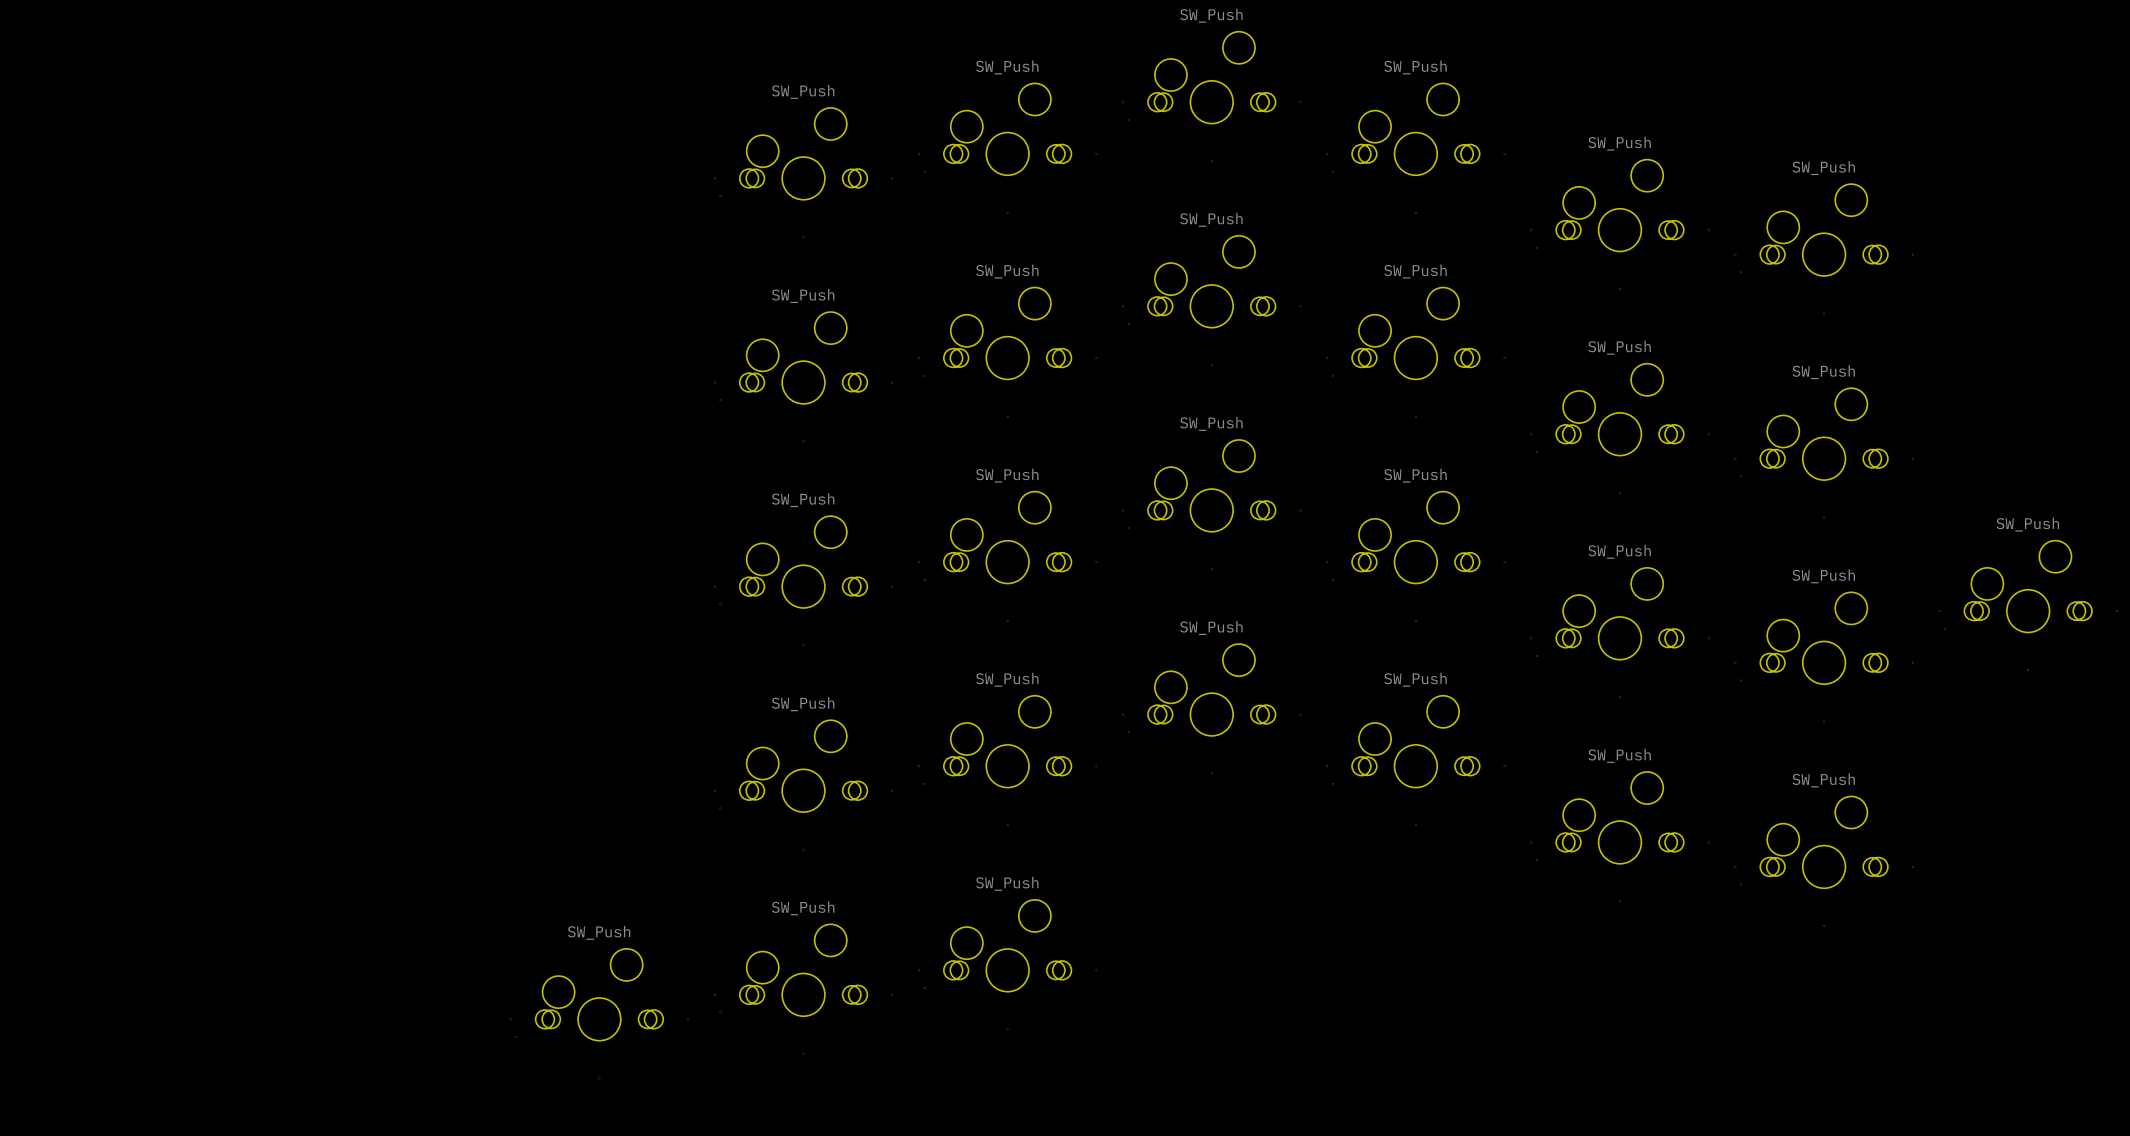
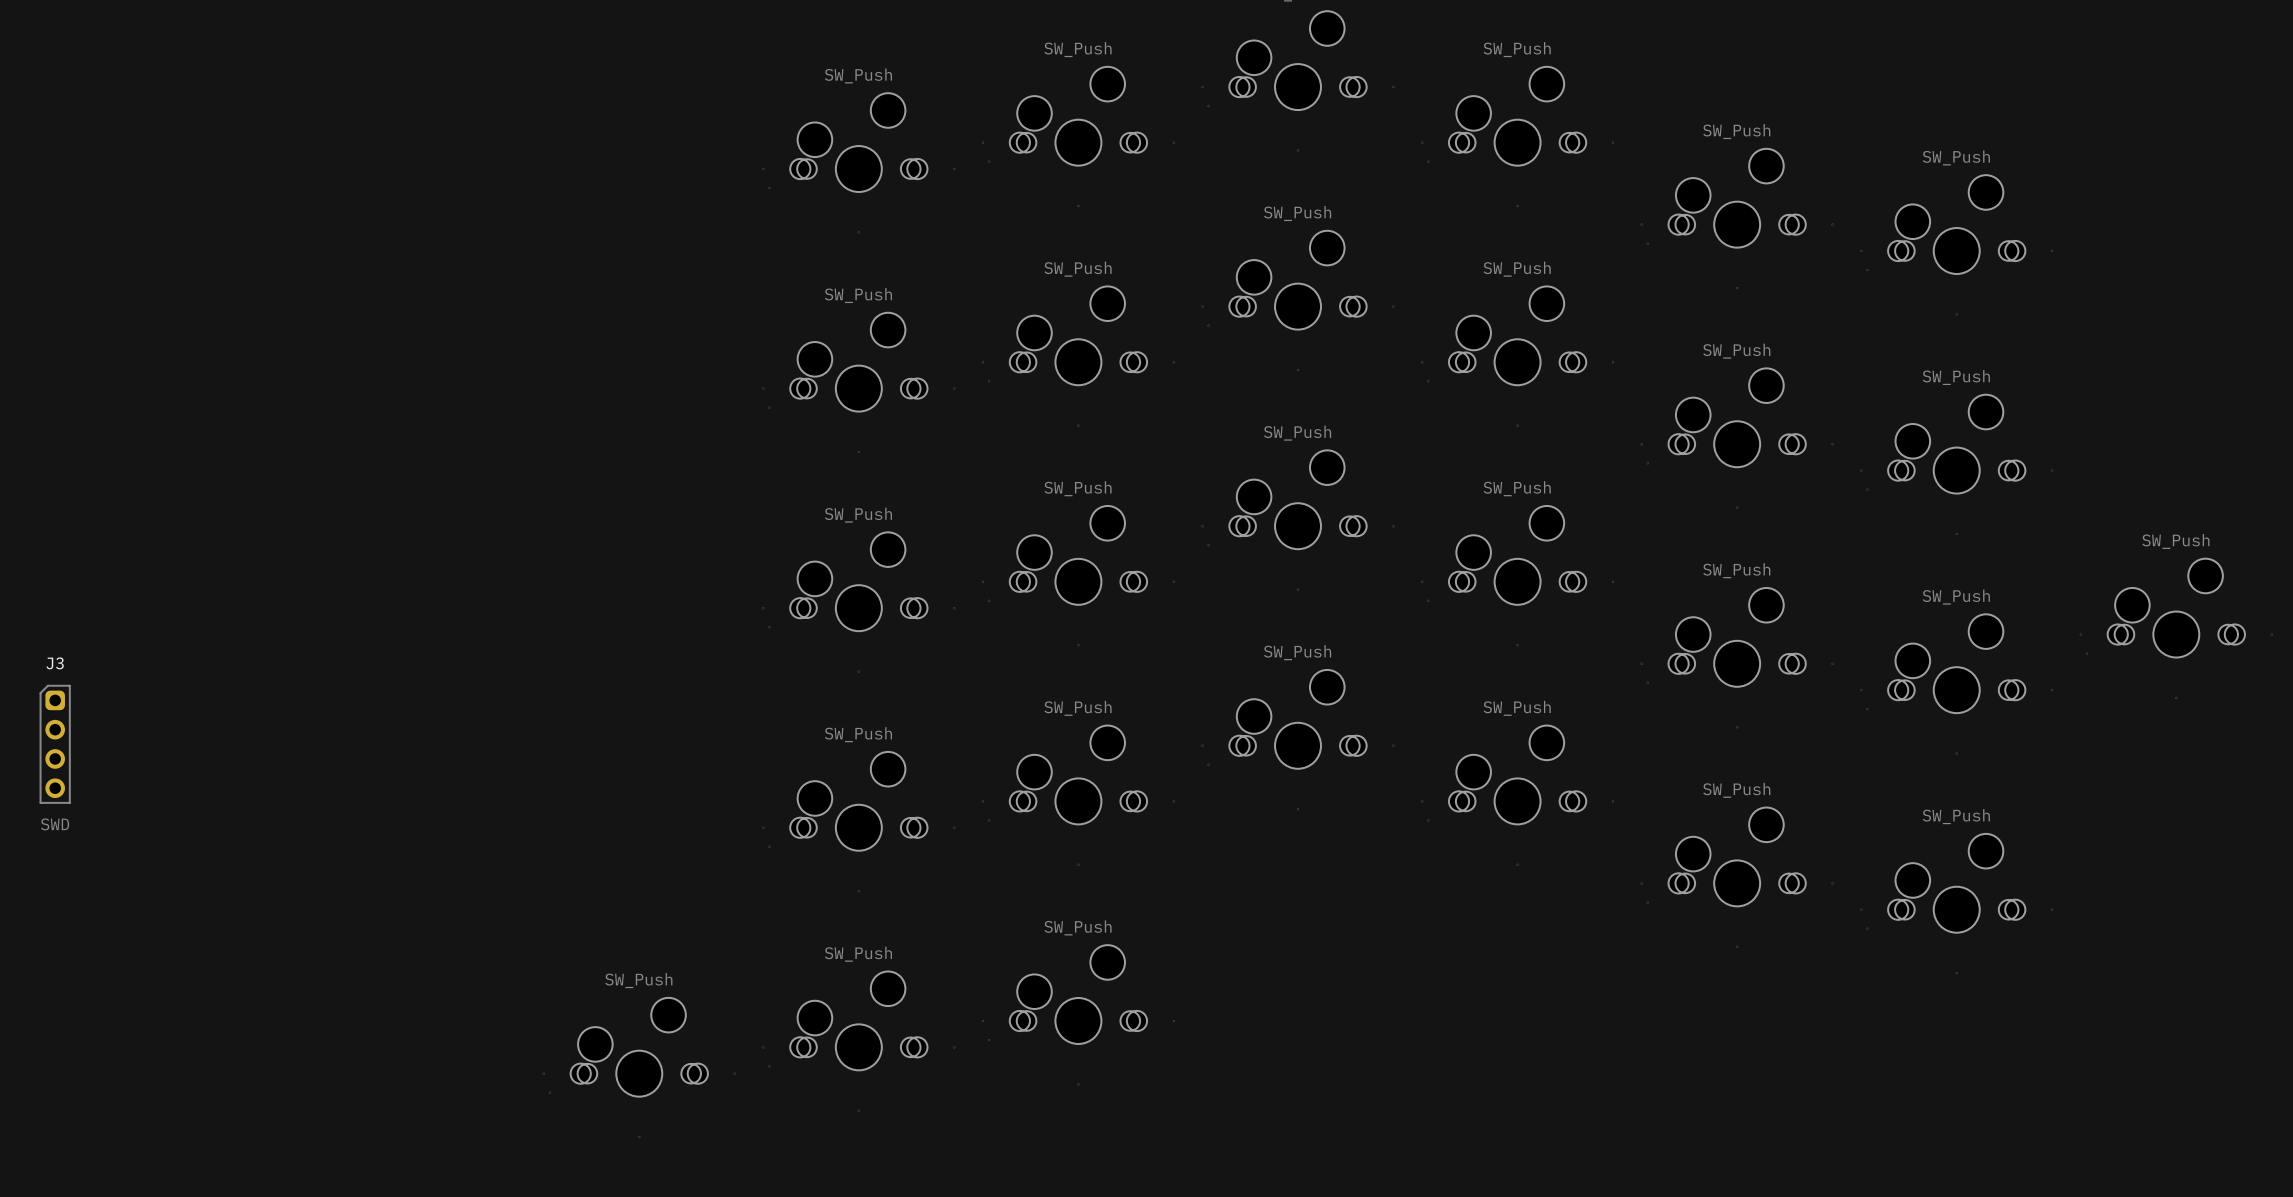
J3: none -> SWD (55, 744)

